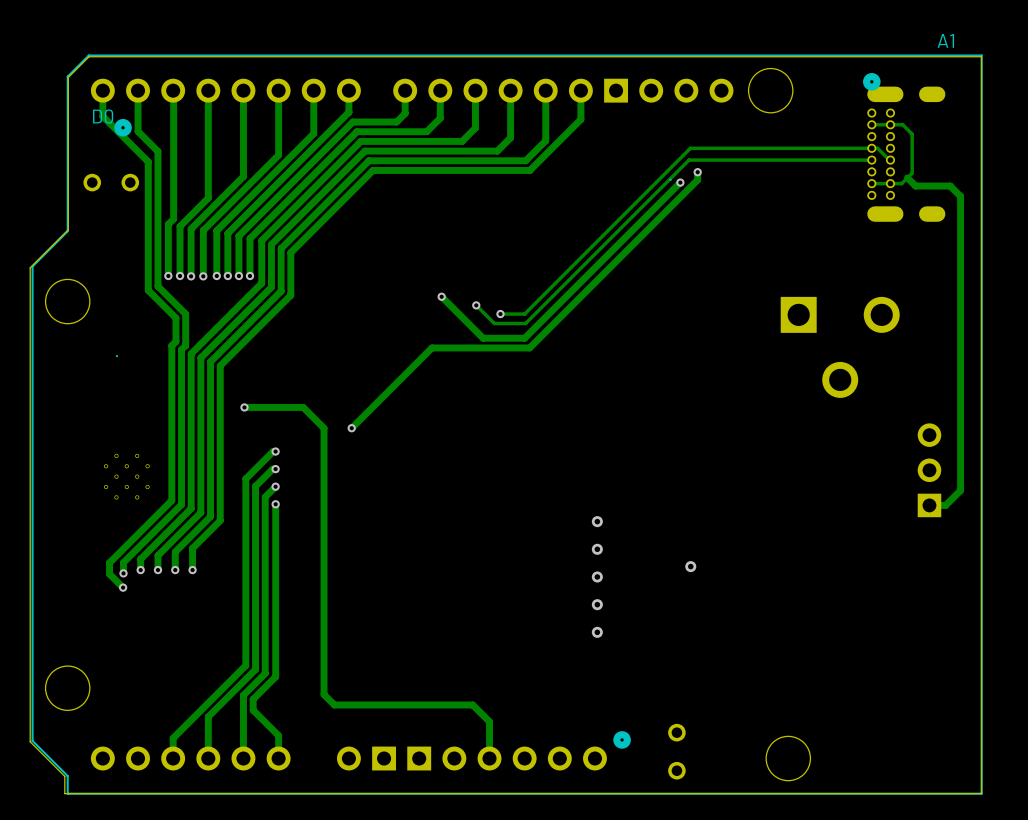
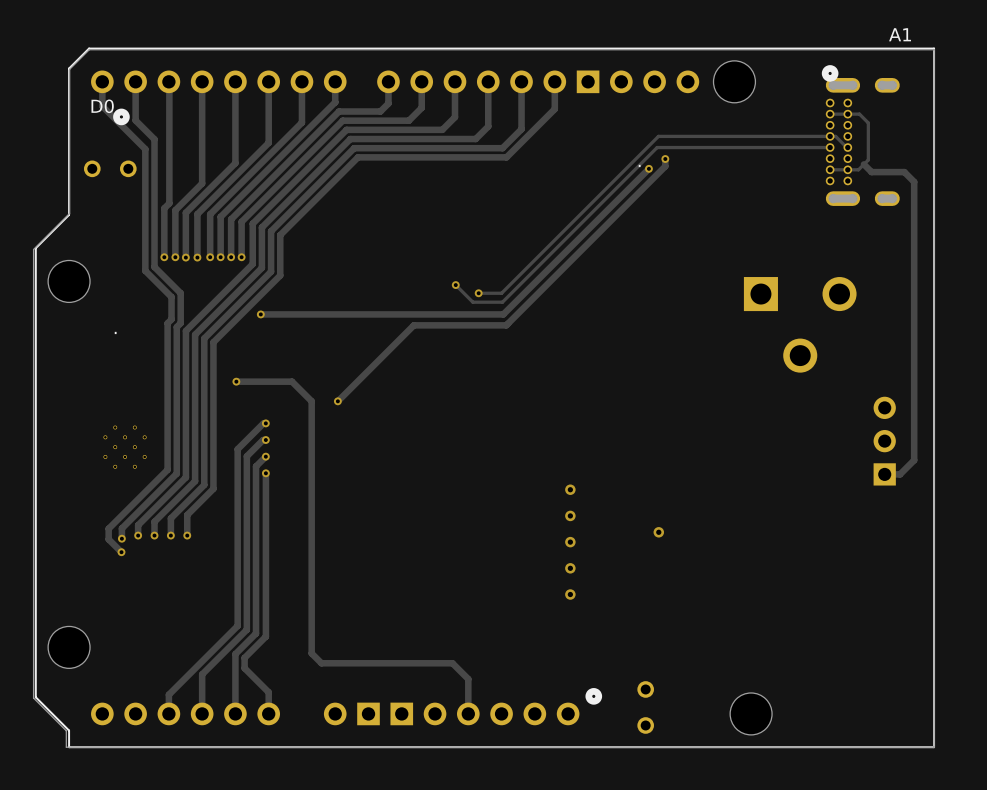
track: (441, 296) (483, 338) (524, 338) (526, 336) -> (260, 314) (503, 314)
via: (441, 296) -> none
via: none -> (260, 314)

